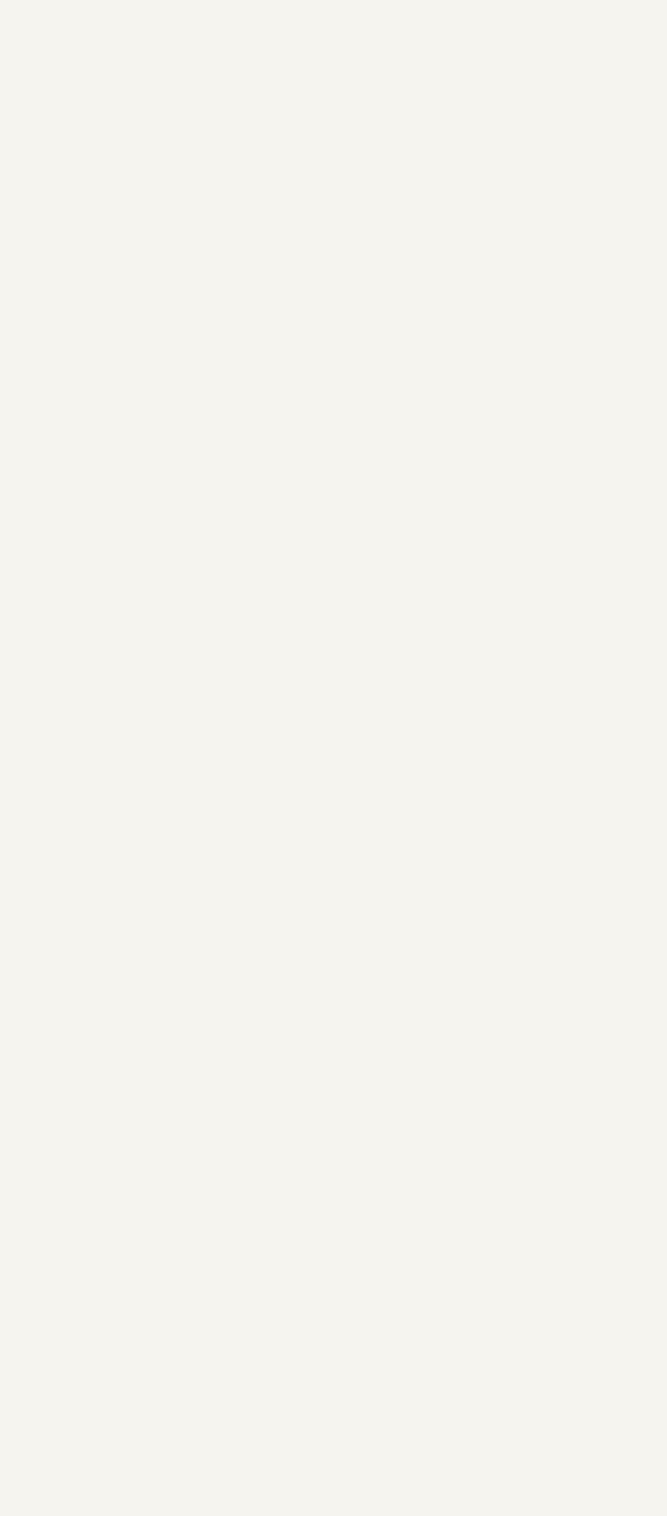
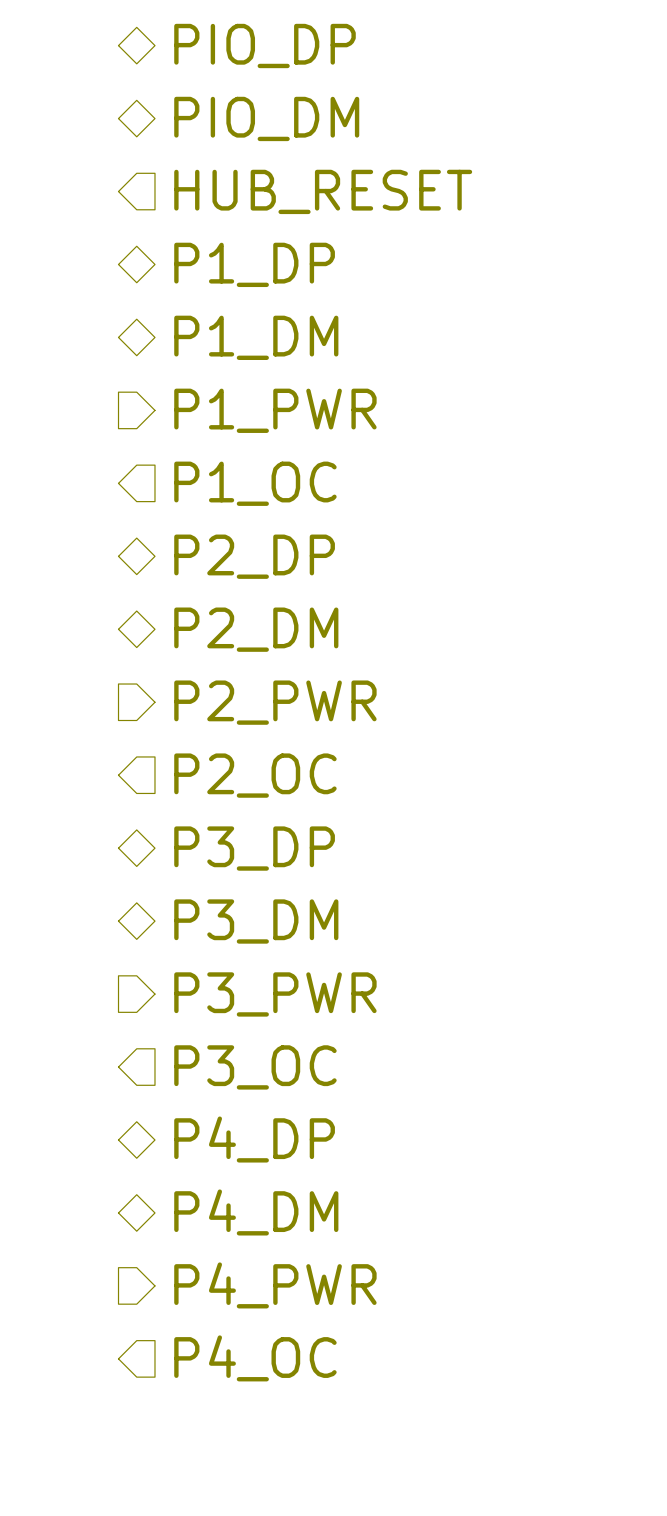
hierarchical label: none -> PIO_DP (264, 45)
hierarchical label: none -> PIO_DM (266, 118)
hierarchical label: none -> HUB_RESET (323, 191)
hierarchical label: none -> P1_DP (254, 264)
hierarchical label: none -> P1_DM (256, 337)
hierarchical label: none -> P1_PWR (275, 410)
hierarchical label: none -> P1_OC (255, 483)
hierarchical label: none -> P2_DP (254, 556)
hierarchical label: none -> P2_DM (256, 629)
hierarchical label: none -> P2_PWR (275, 702)
hierarchical label: none -> P2_OC (255, 775)
hierarchical label: none -> P3_DP (254, 848)
hierarchical label: none -> P3_DM (256, 921)
hierarchical label: none -> P3_PWR (275, 994)
hierarchical label: none -> P3_OC (255, 1067)
hierarchical label: none -> P4_DP (254, 1139)
hierarchical label: none -> P4_DM (256, 1212)
hierarchical label: none -> P4_PWR (275, 1285)
hierarchical label: none -> P4_OC (255, 1358)

